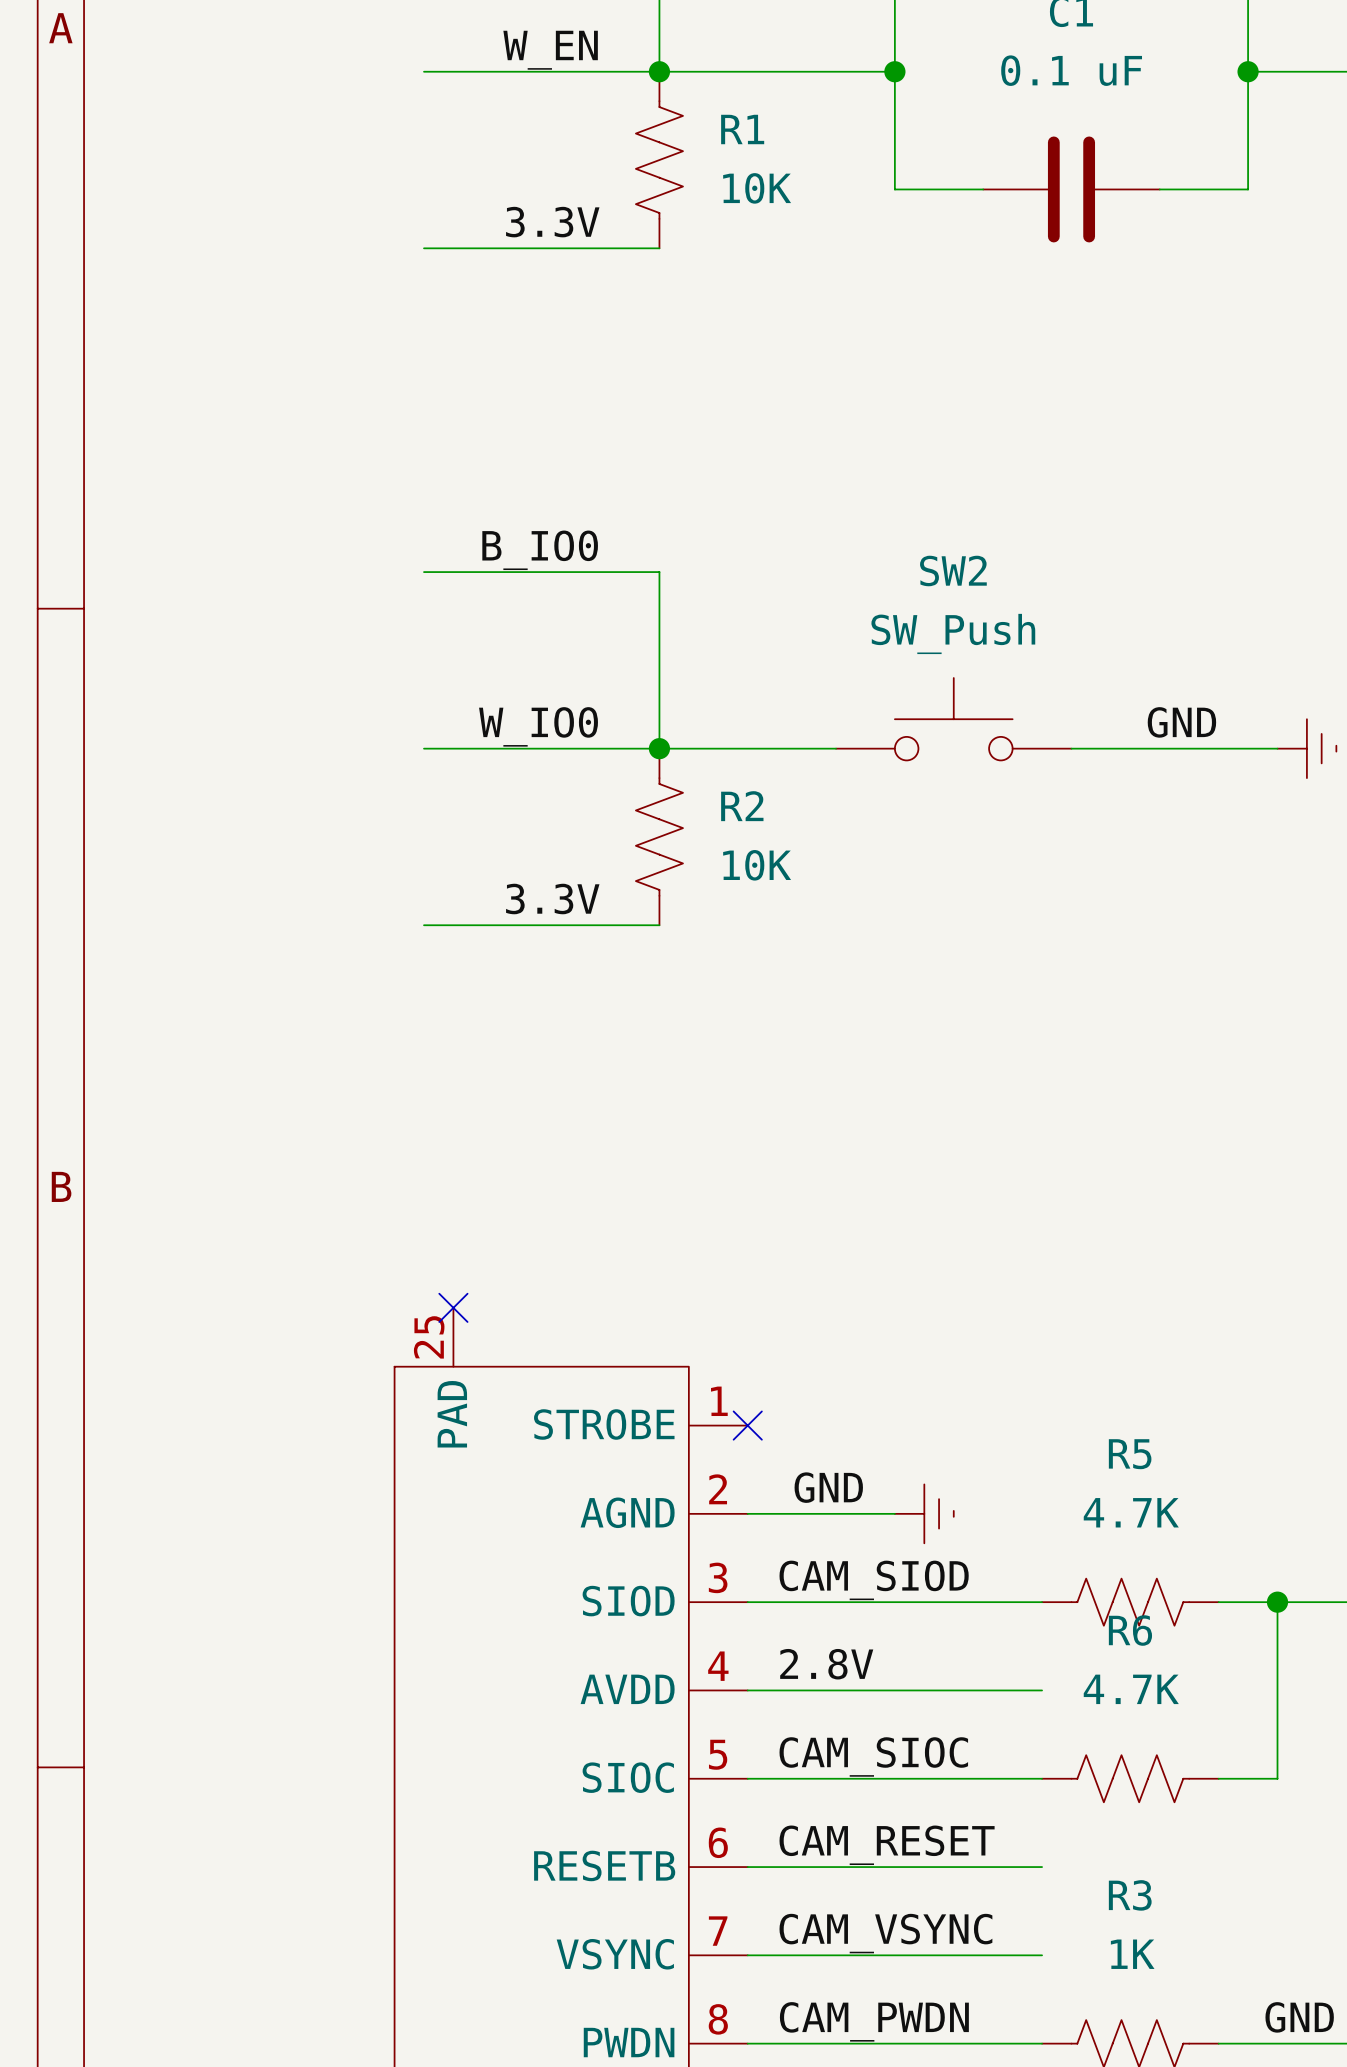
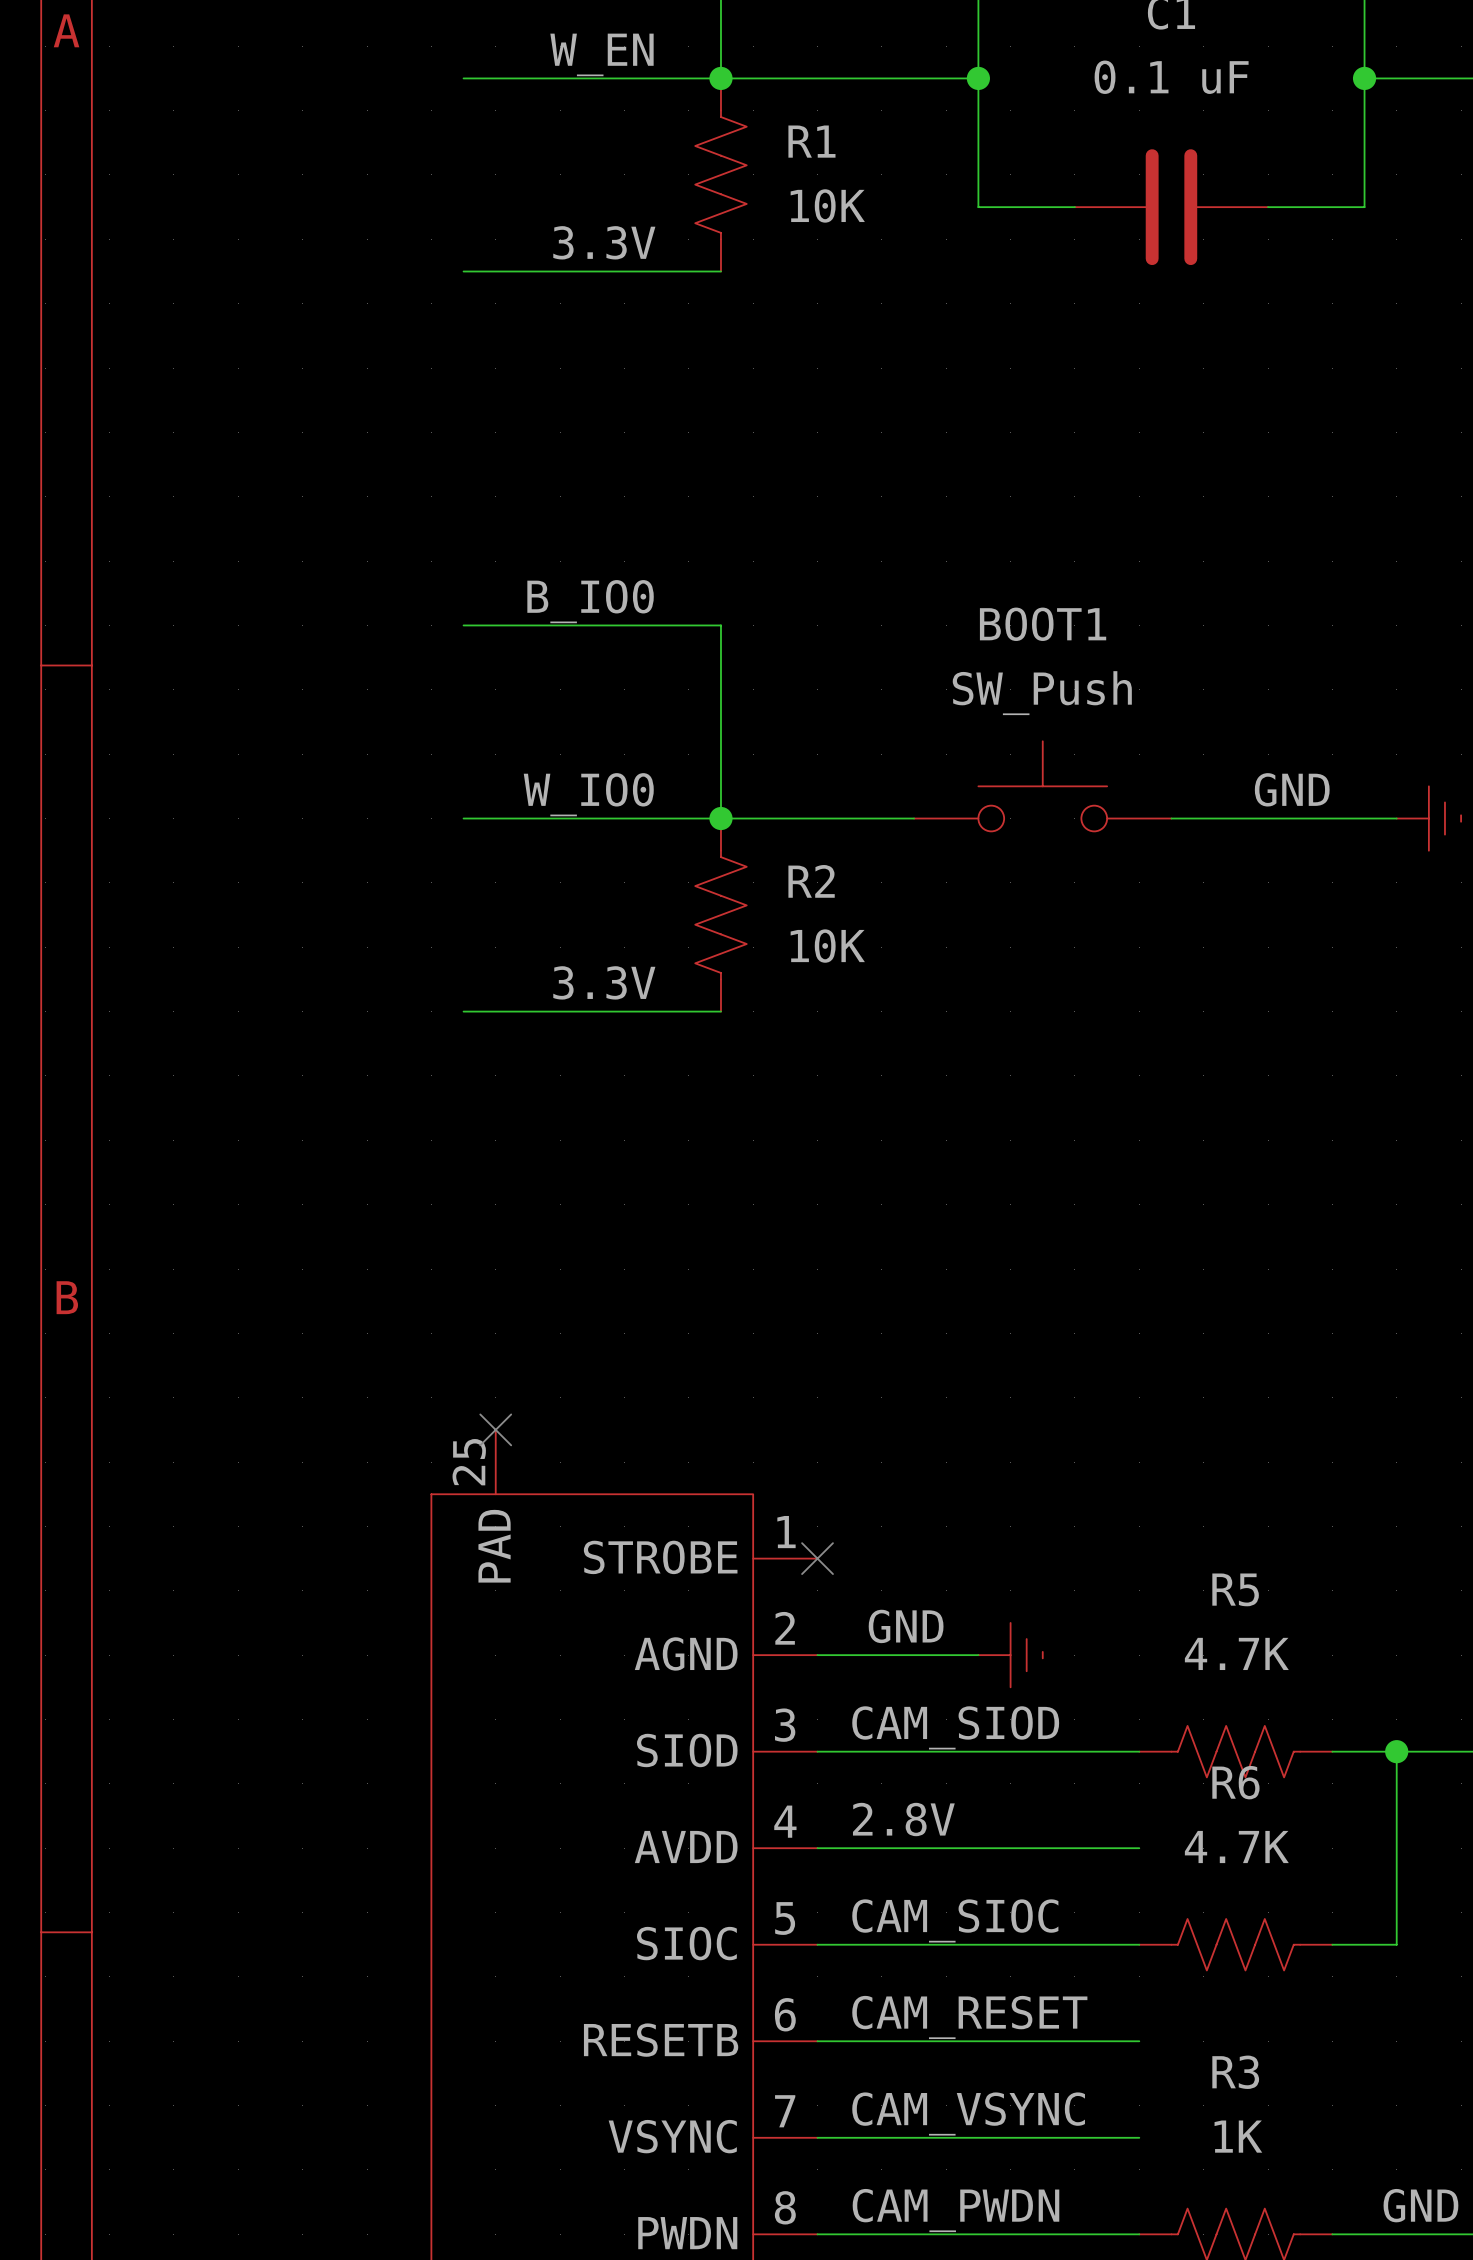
SW2 name: SW2 (953, 570) -> BOOT1 (1043, 624)

